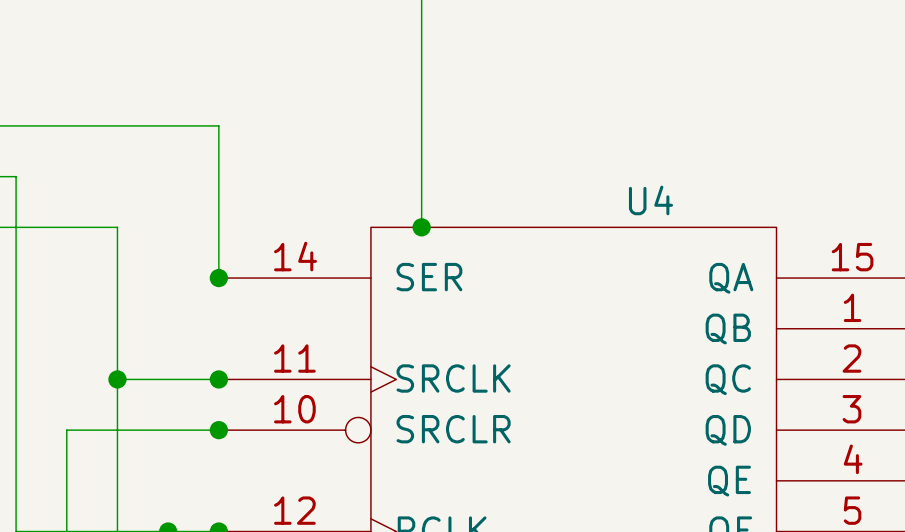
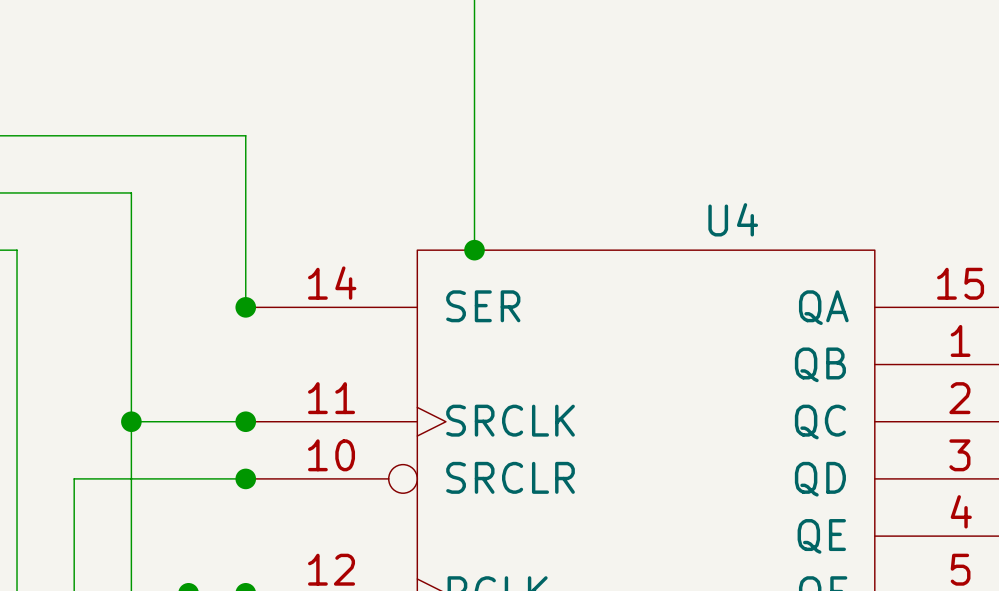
wire: (16, 176) (16, 227) (117, 227) -> (17, 192) (131, 192) (131, 250)

